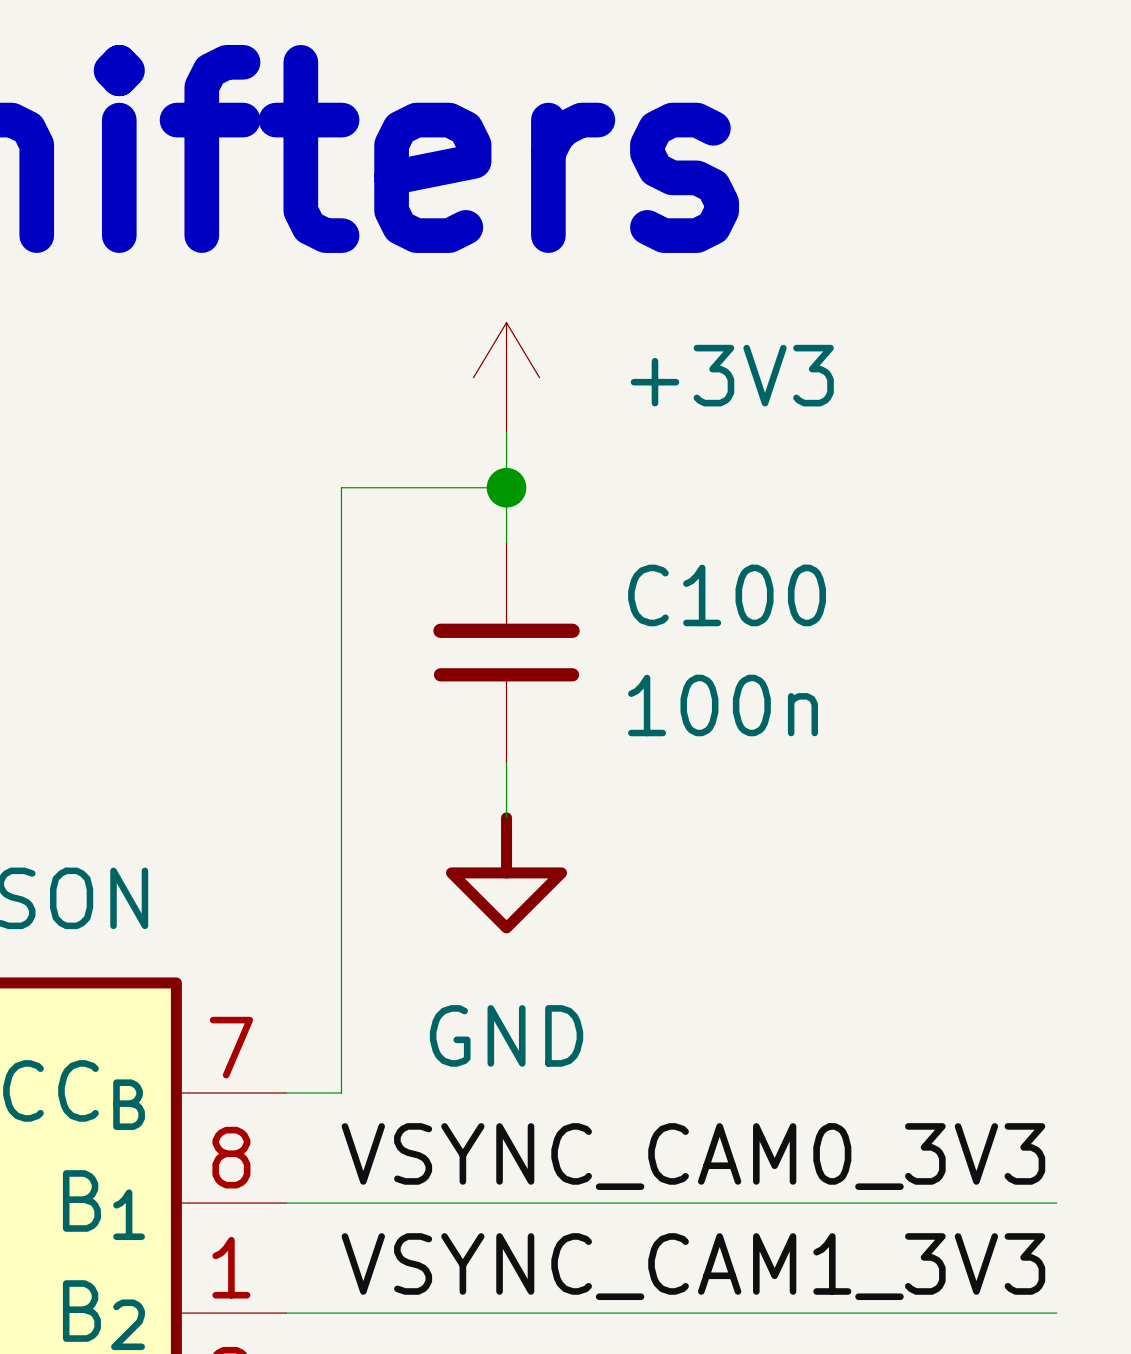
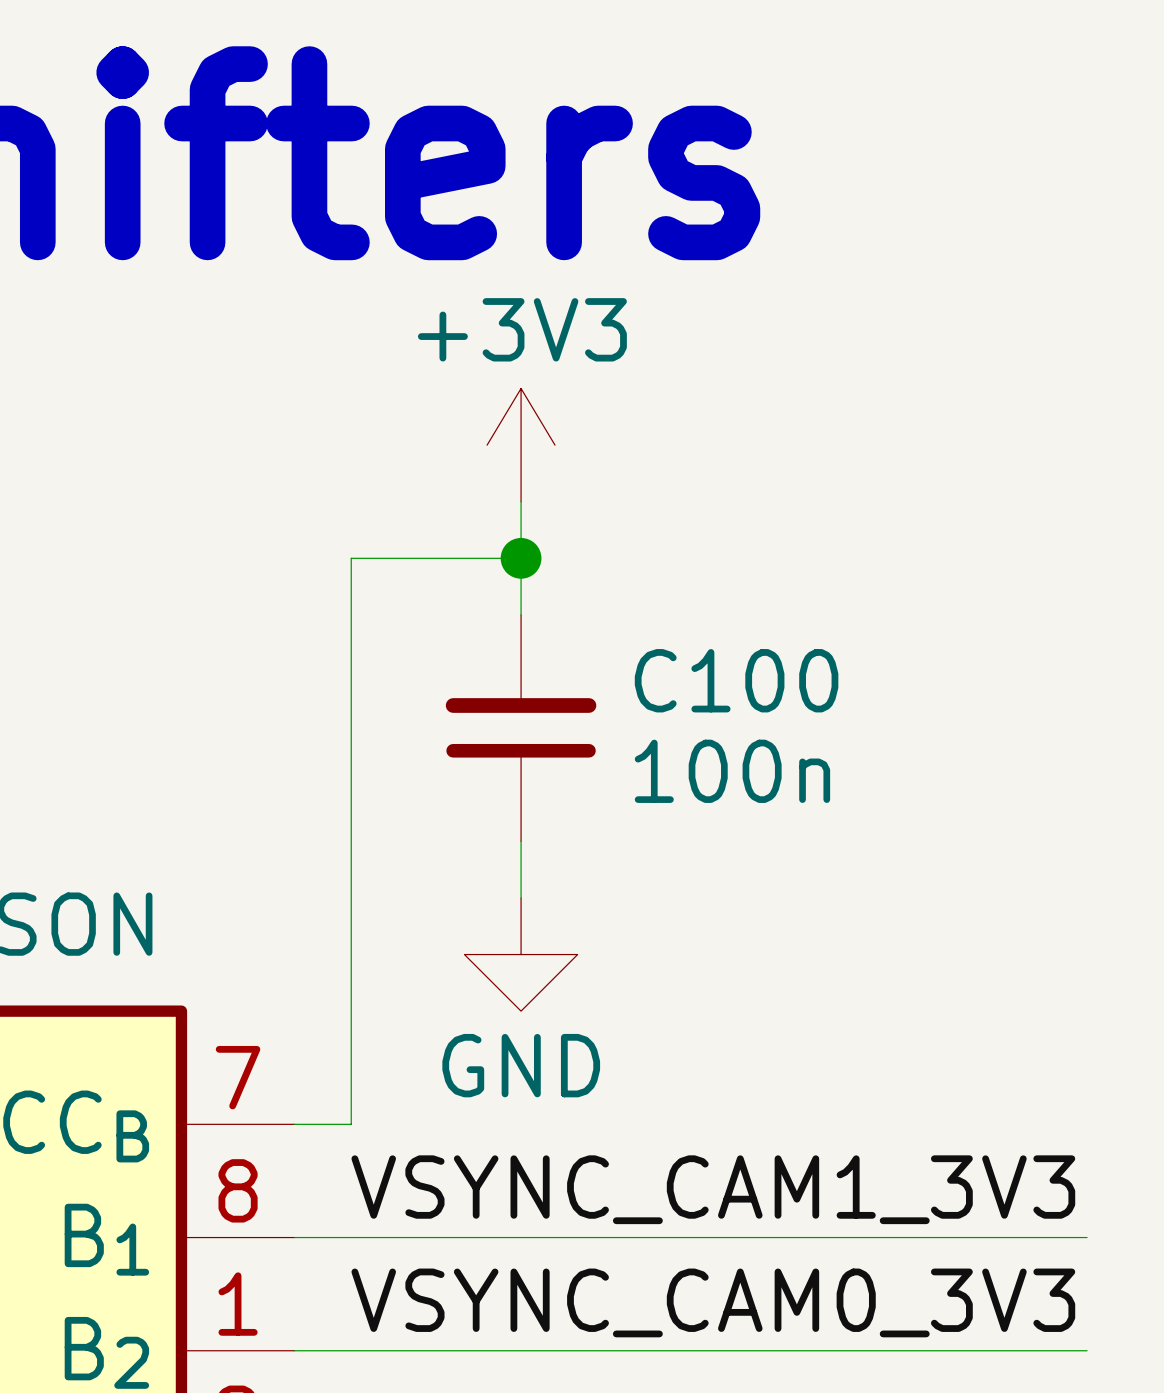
power symbol text position: +3V3 (732, 375) -> +3V3 (522, 329)
power symbol position: +3V3 (506, 377) -> +3V3 (521, 445)
wire: (506, 432) (506, 487) (341, 487) (341, 542) -> (521, 614) (521, 558) (351, 558)
junction position: (506, 487) -> (521, 558)
C100 name position: C100 (727, 595) -> C100 (736, 680)
C100 position: (506, 652) -> (521, 728)
C100 text position: 100n (723, 705) -> 100n (732, 771)
power symbol: GND (506, 872) -> none
power symbol: none -> GND (521, 954)
label: VSYNC_CAM0_3V3 (693, 1156) -> VSYNC_CAM1_3V3 (713, 1189)
label: VSYNC_CAM1_3V3 (693, 1266) -> VSYNC_CAM0_3V3 (713, 1302)

